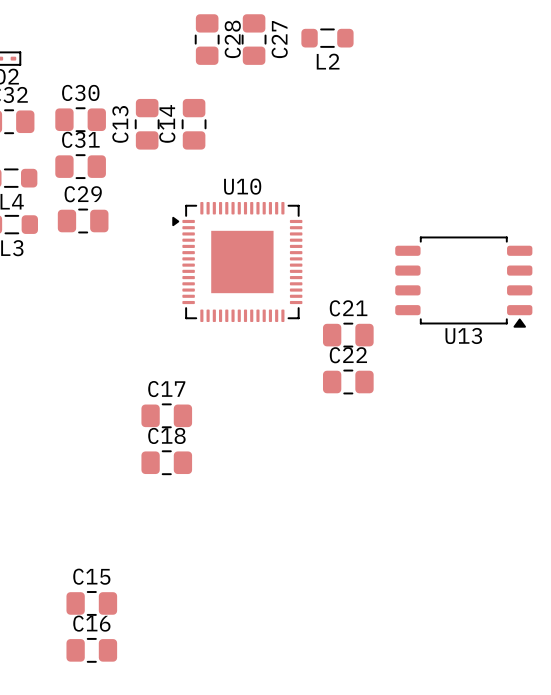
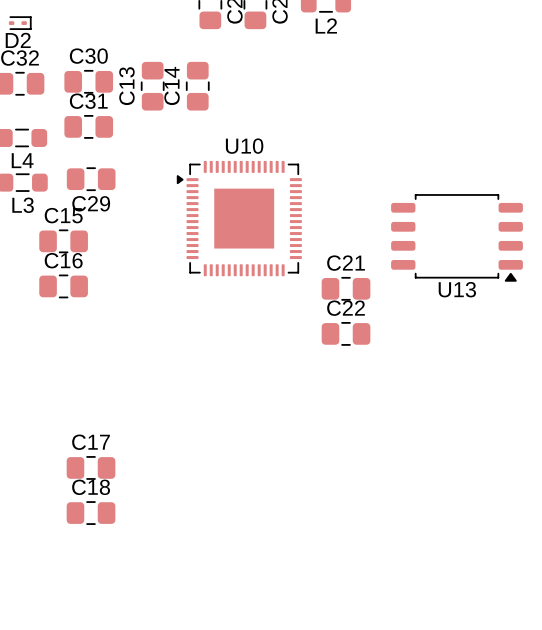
C29 name position: C29 (83, 194) -> C29 (91, 203)
C17 position: (166, 415) -> (91, 467)
C18 position: (166, 462) -> (91, 513)
C15 position: (91, 603) -> (63, 241)
C16 position: (91, 650) -> (63, 286)

